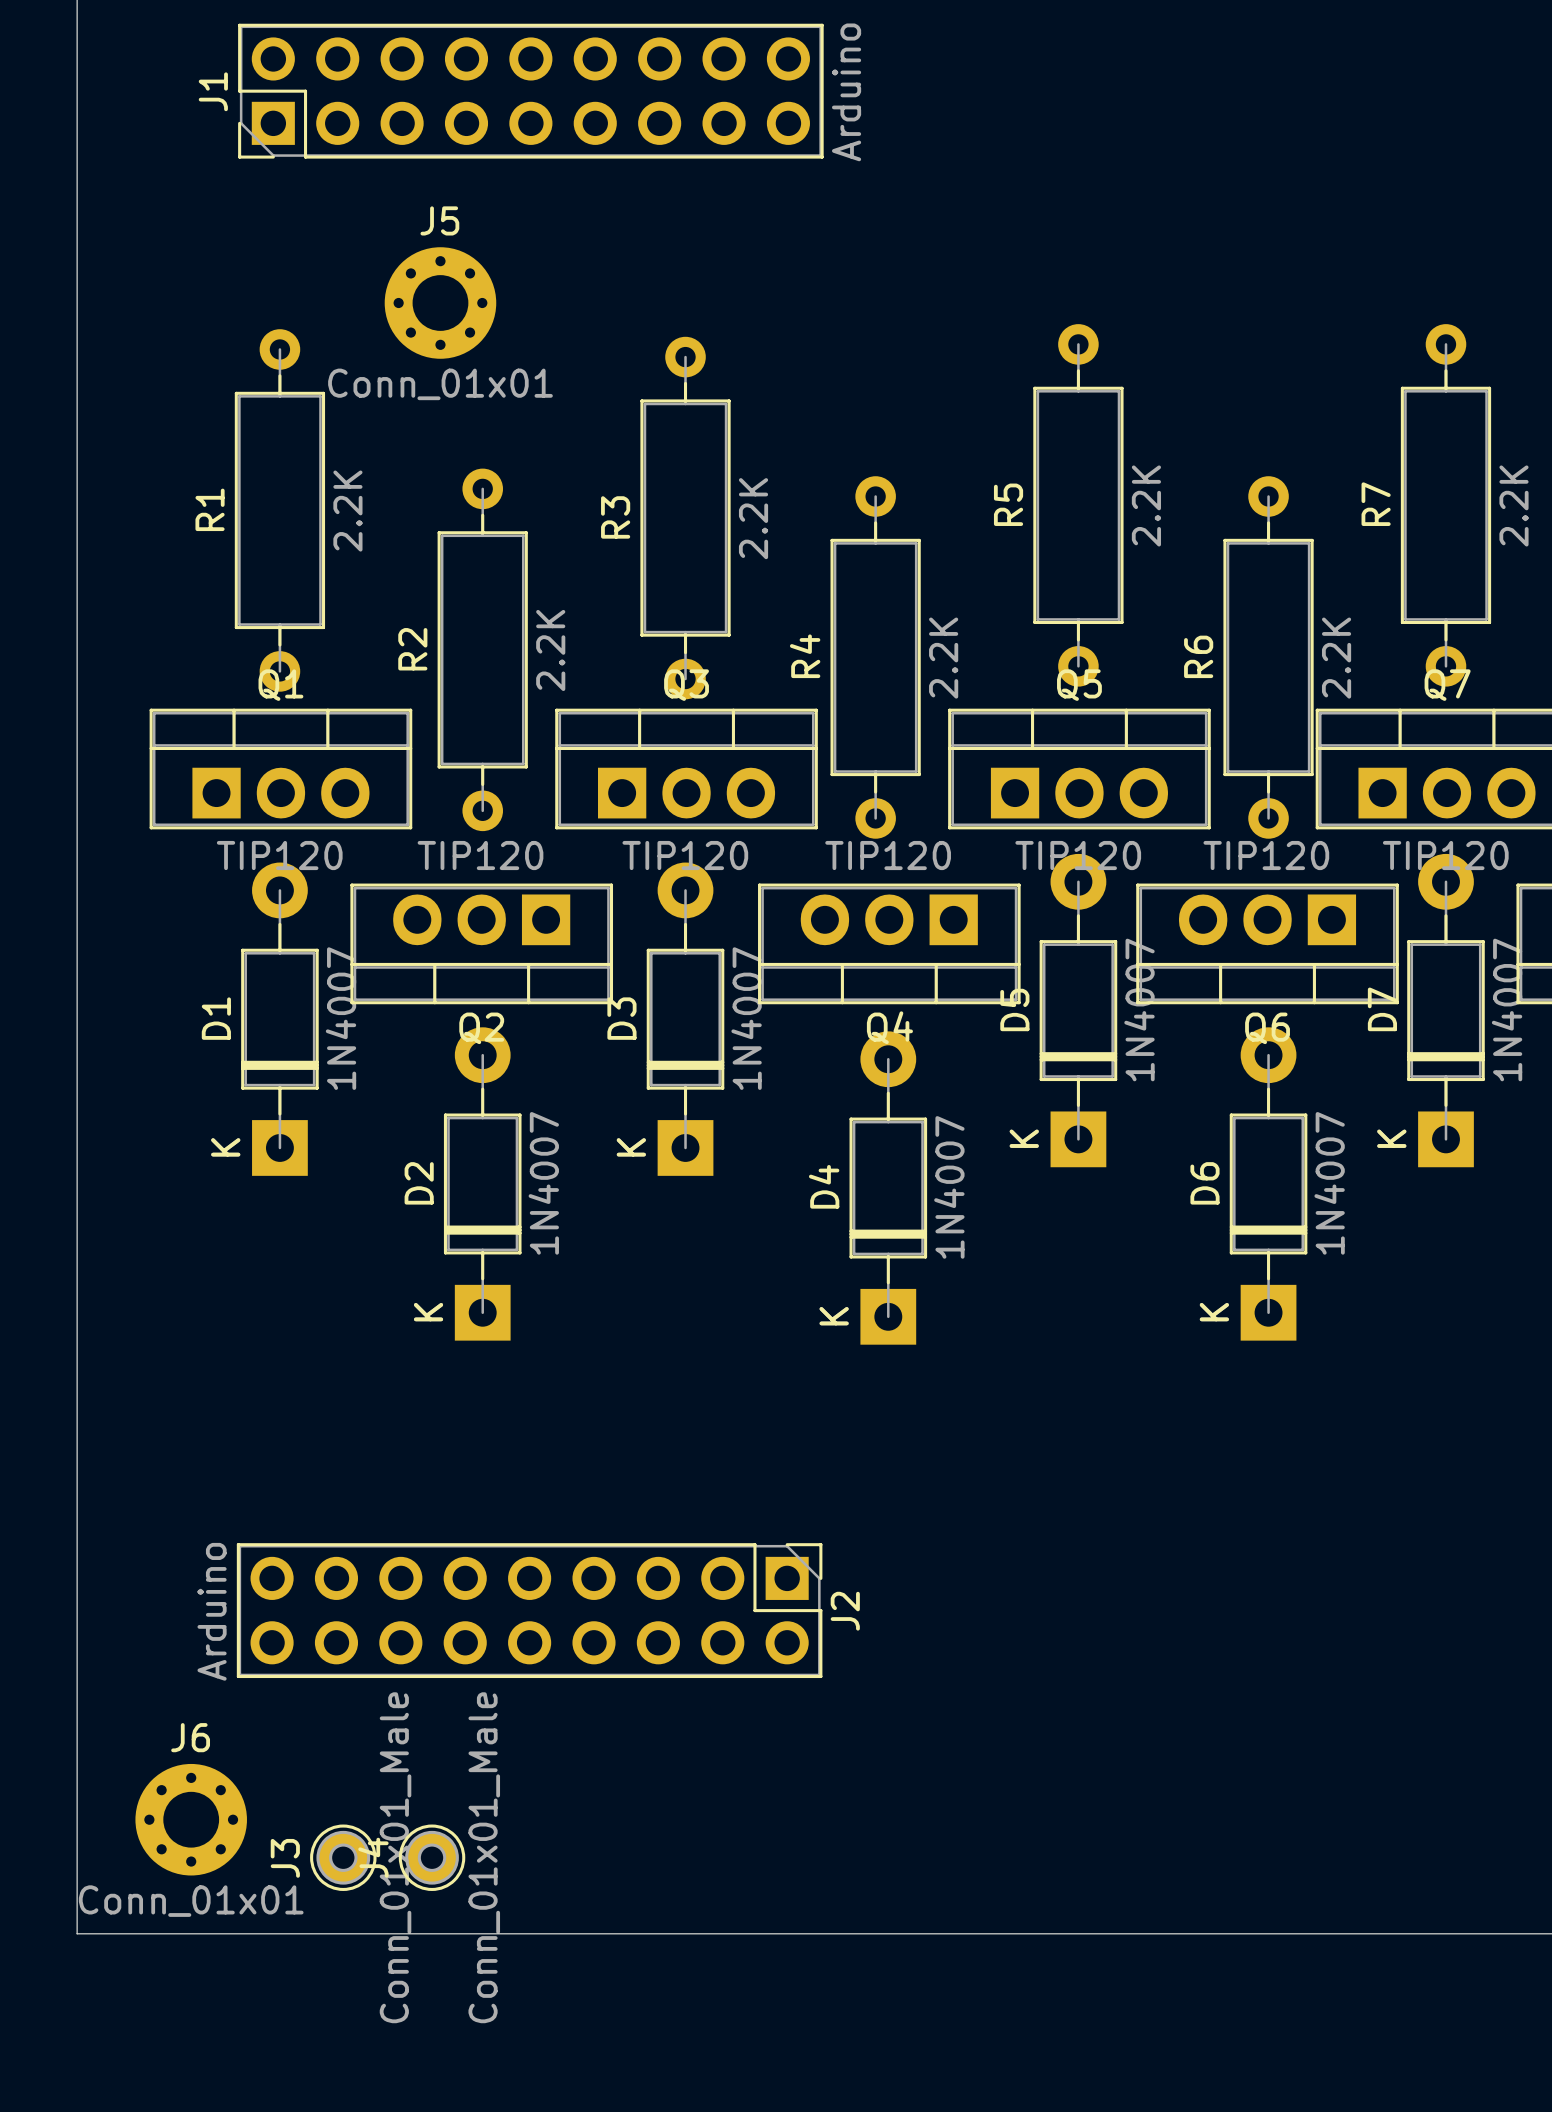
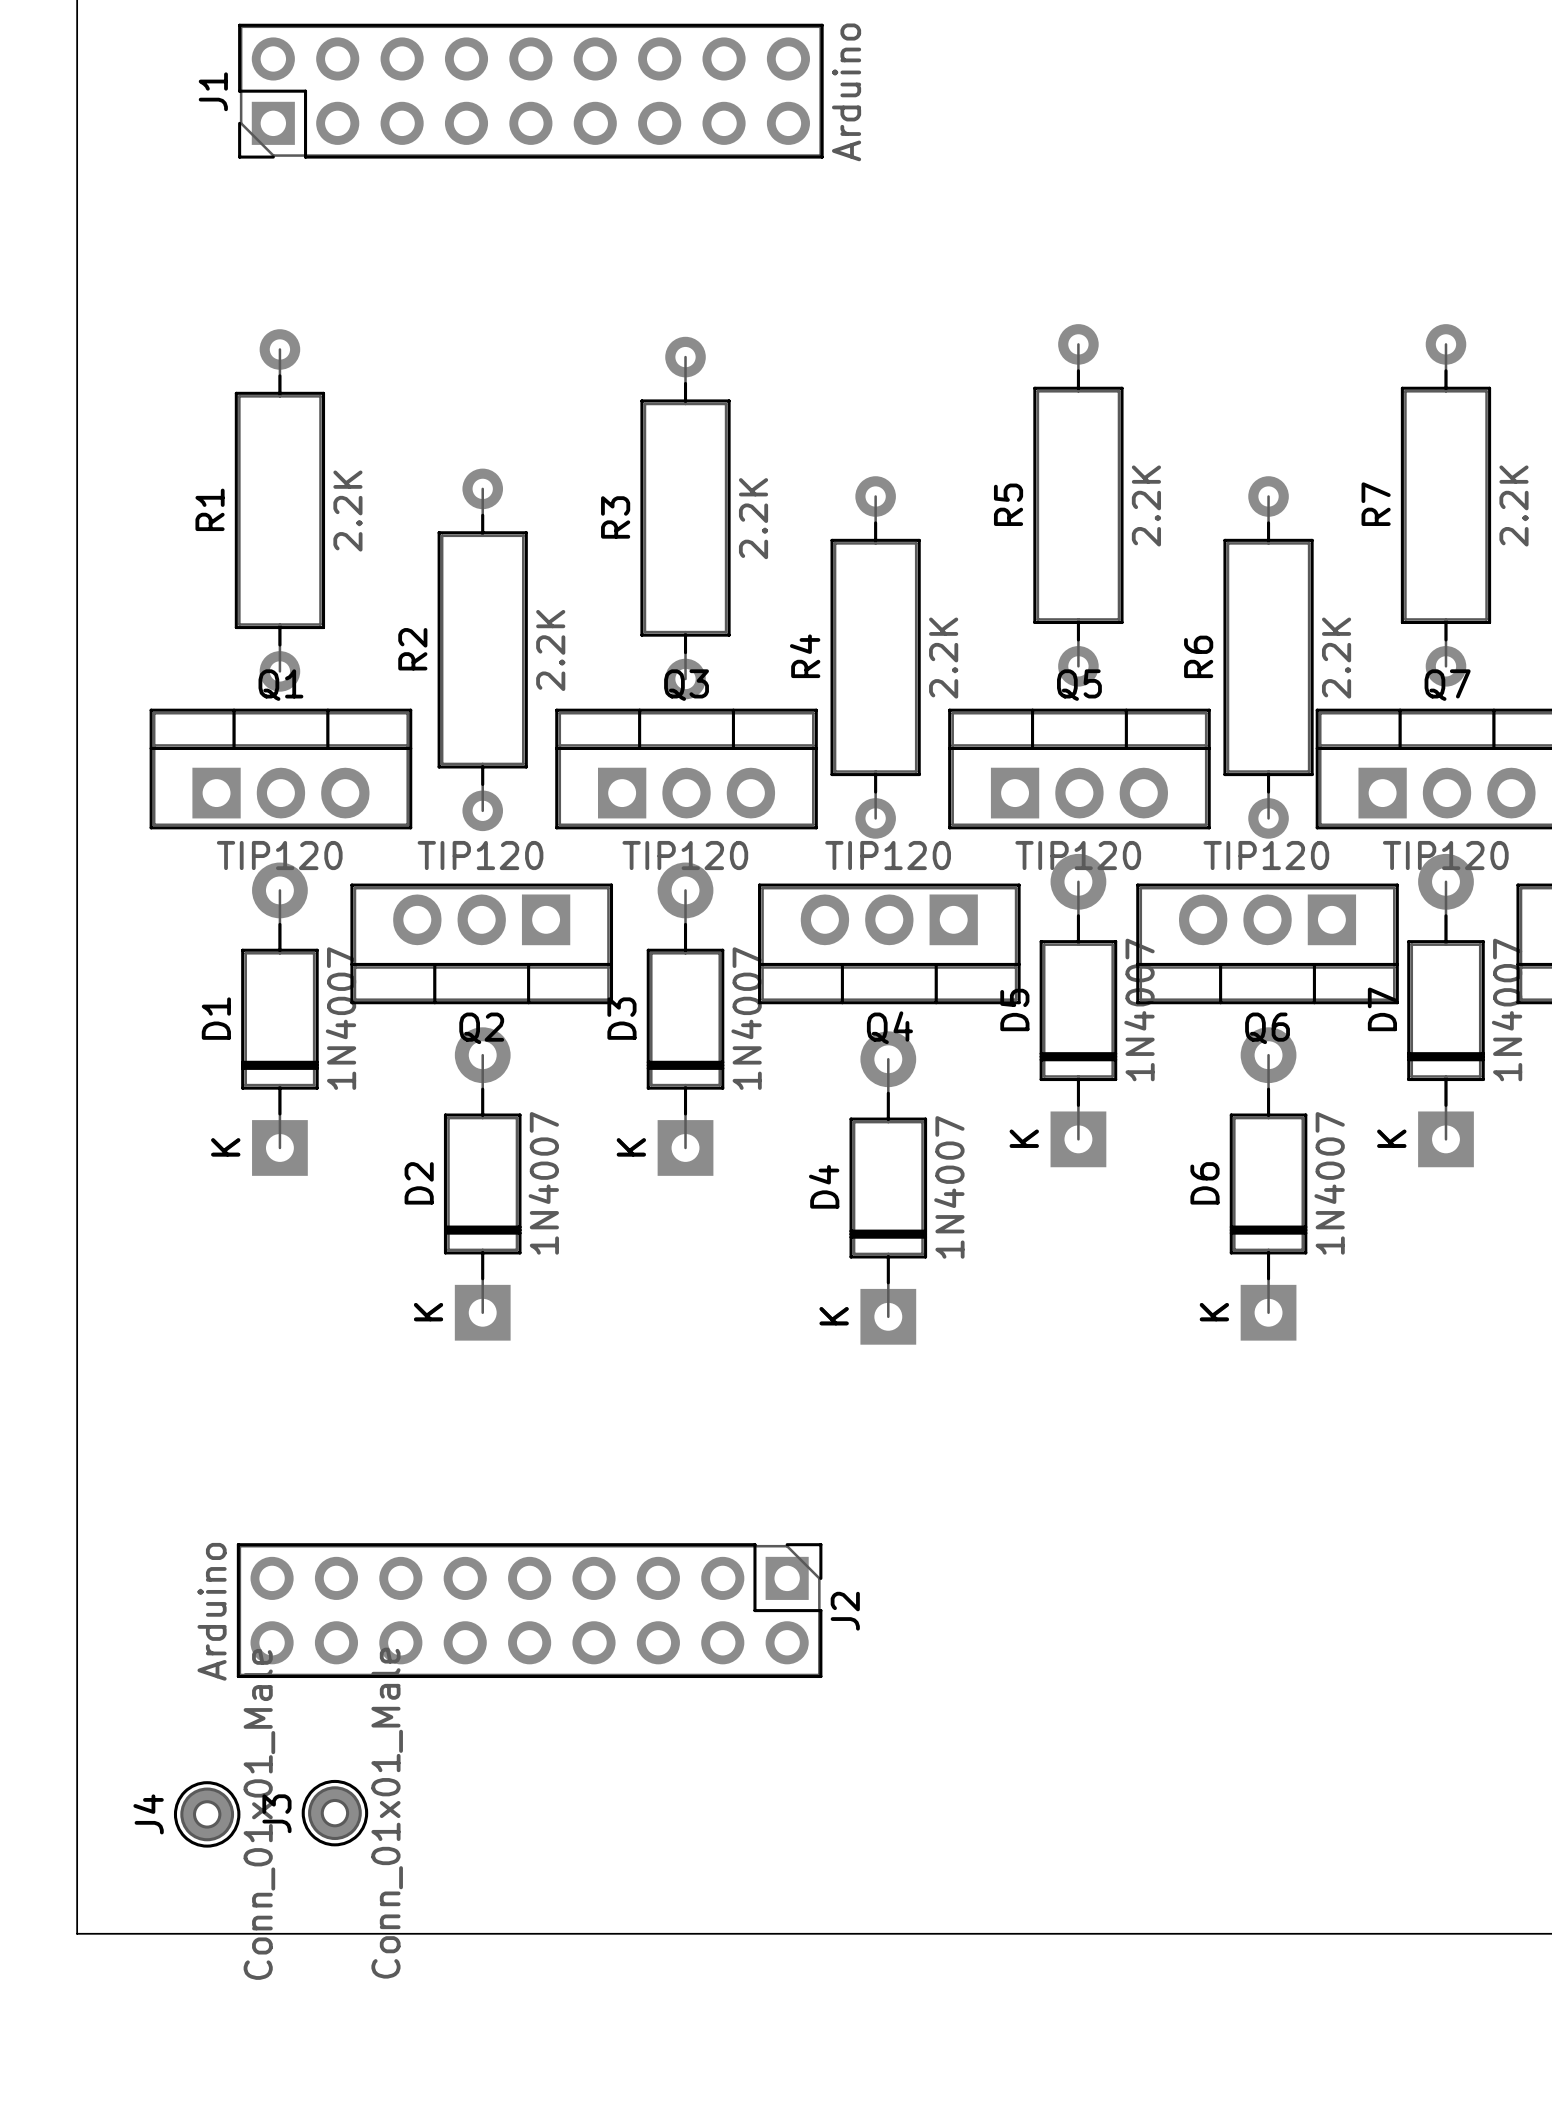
J5: Conn_01x01 (440, 303) -> none
J6: Conn_01x01 (191, 1819) -> none
J3 position: (343, 1857) -> (334, 1813)
J4 position: (432, 1857) -> (207, 1814)

